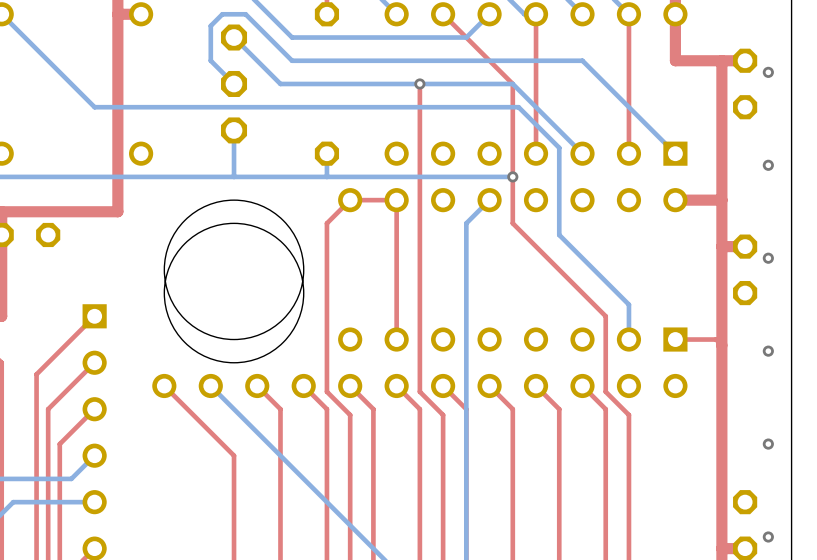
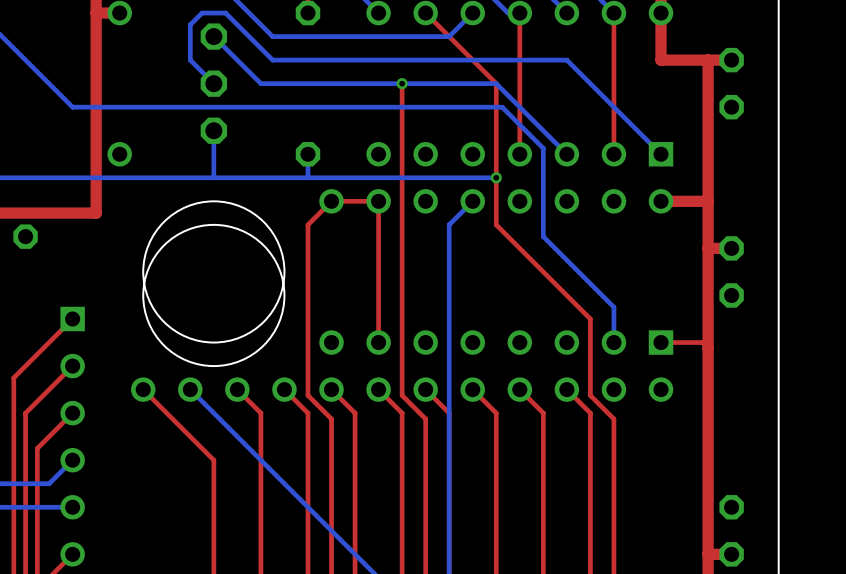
via: (768, 72) -> none
via: (768, 165) -> none
via: (768, 258) -> none
via: (768, 351) -> none
via: (768, 444) -> none
via: (768, 536) -> none

